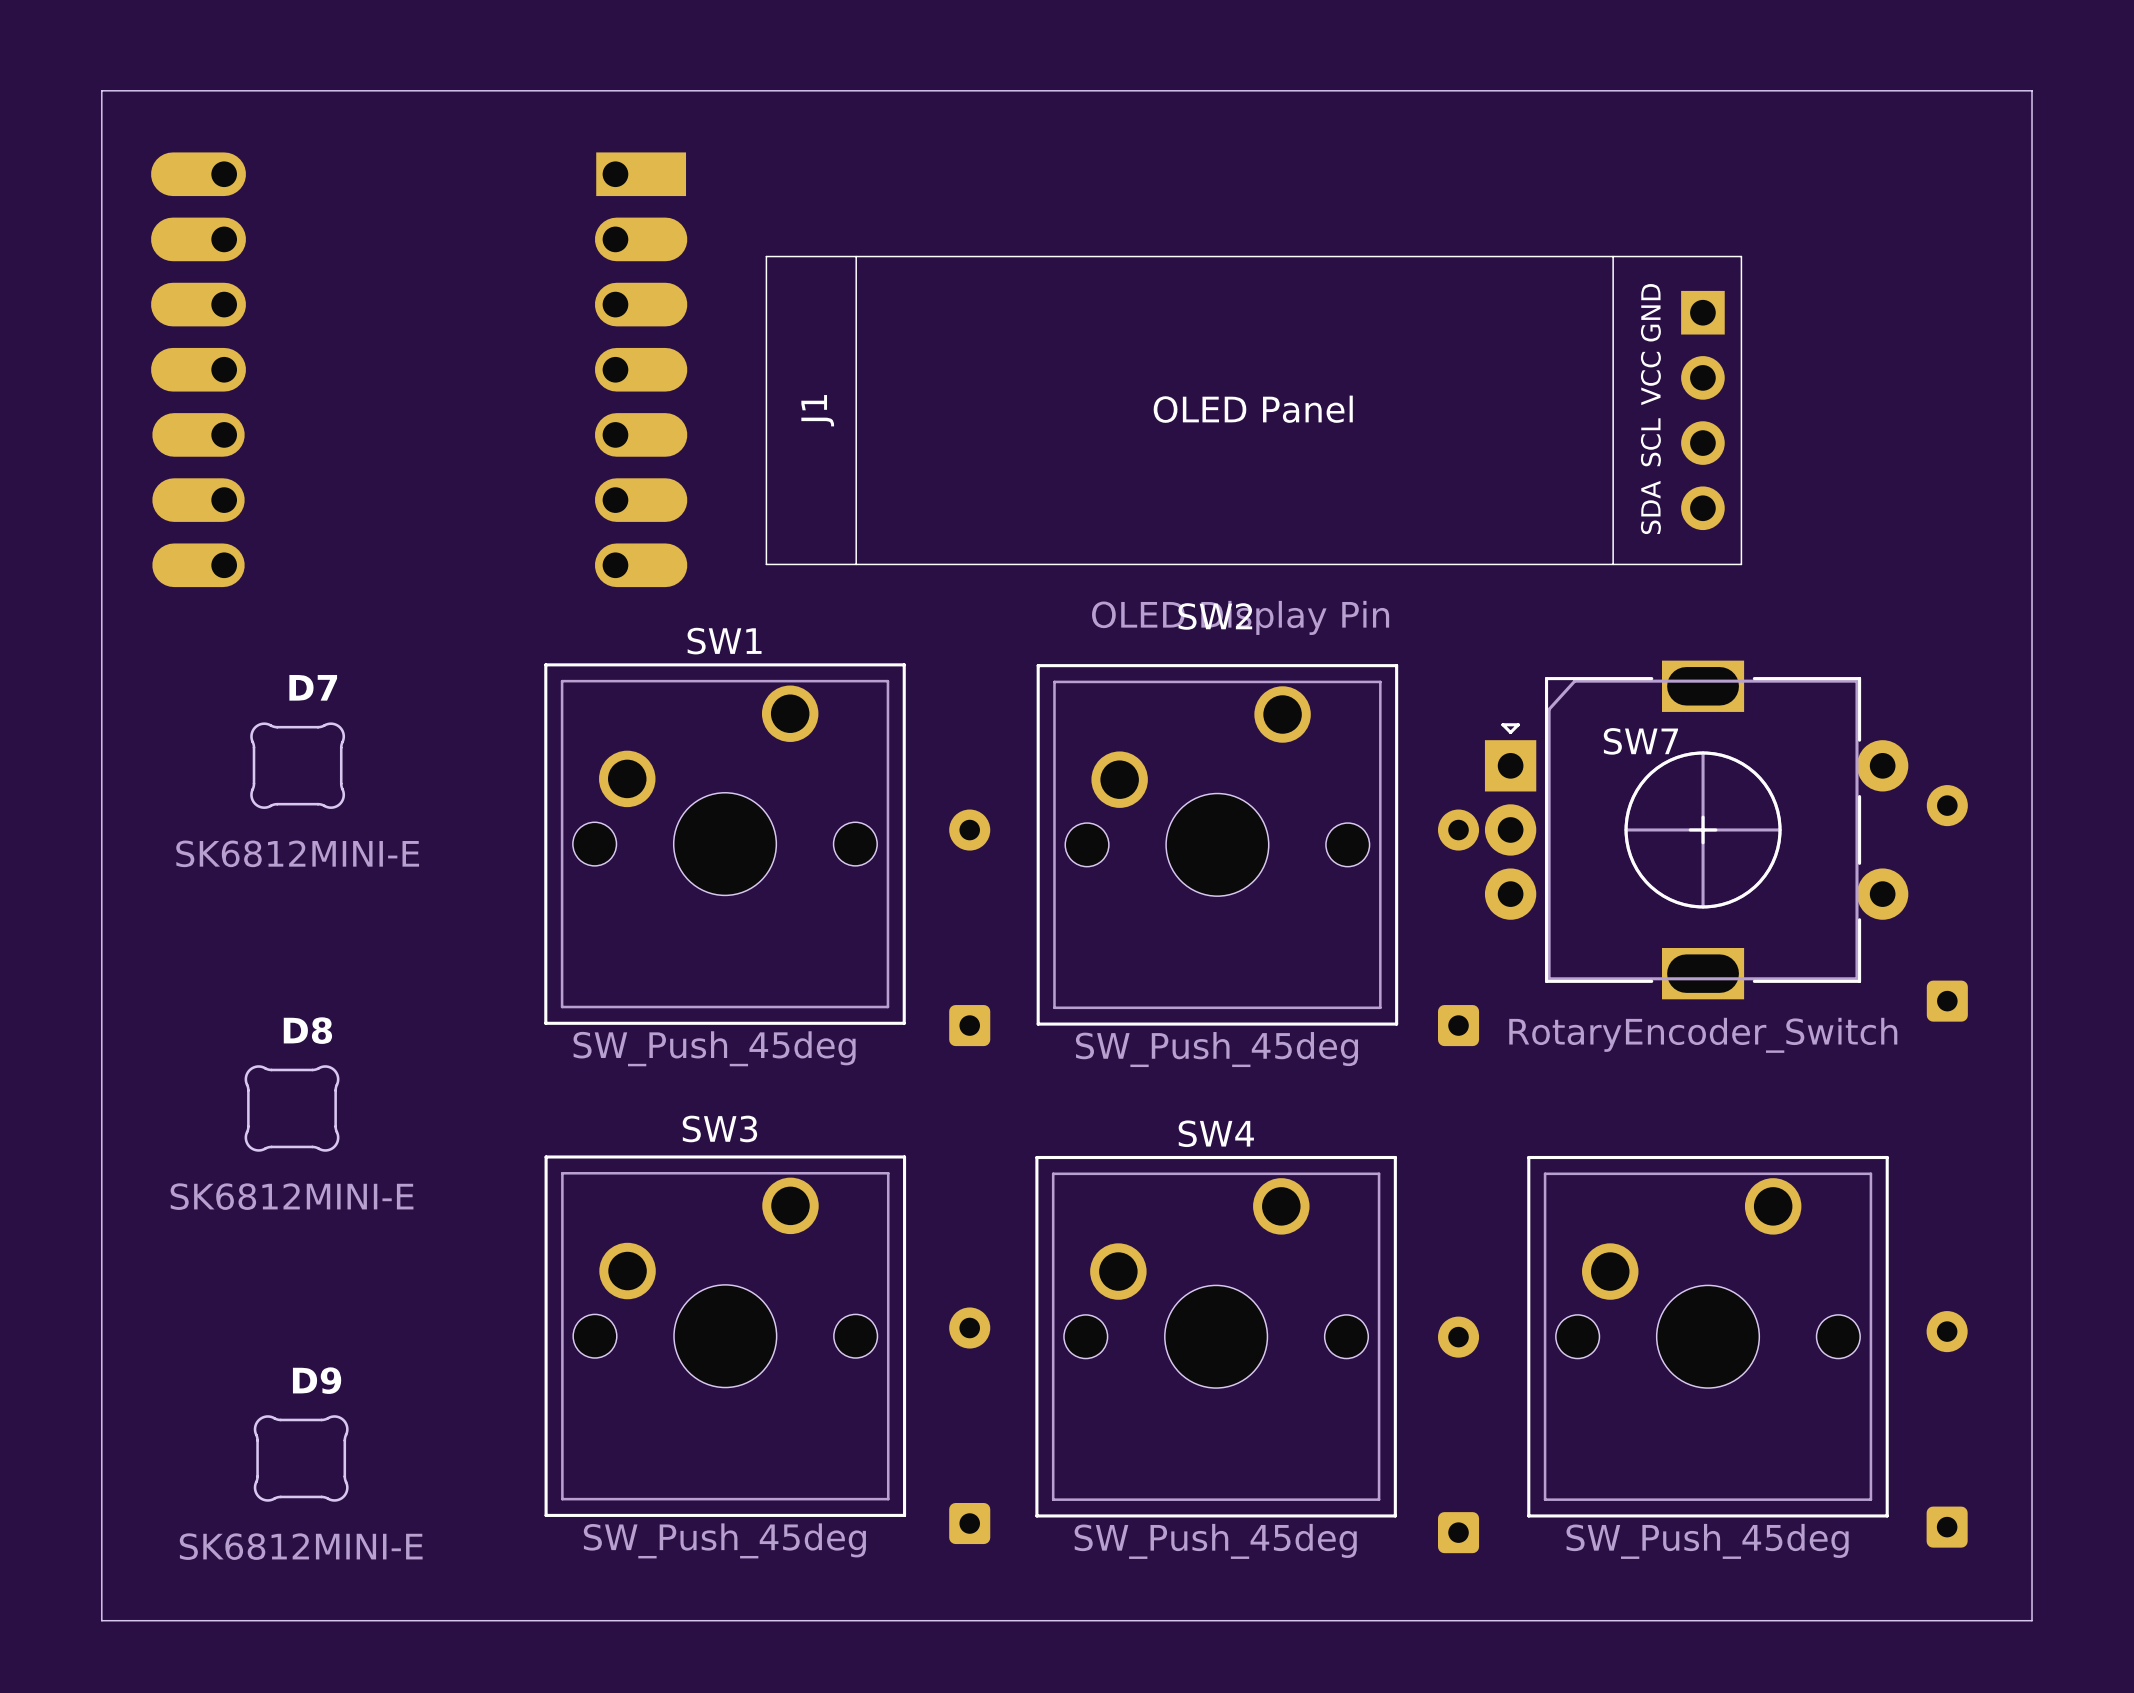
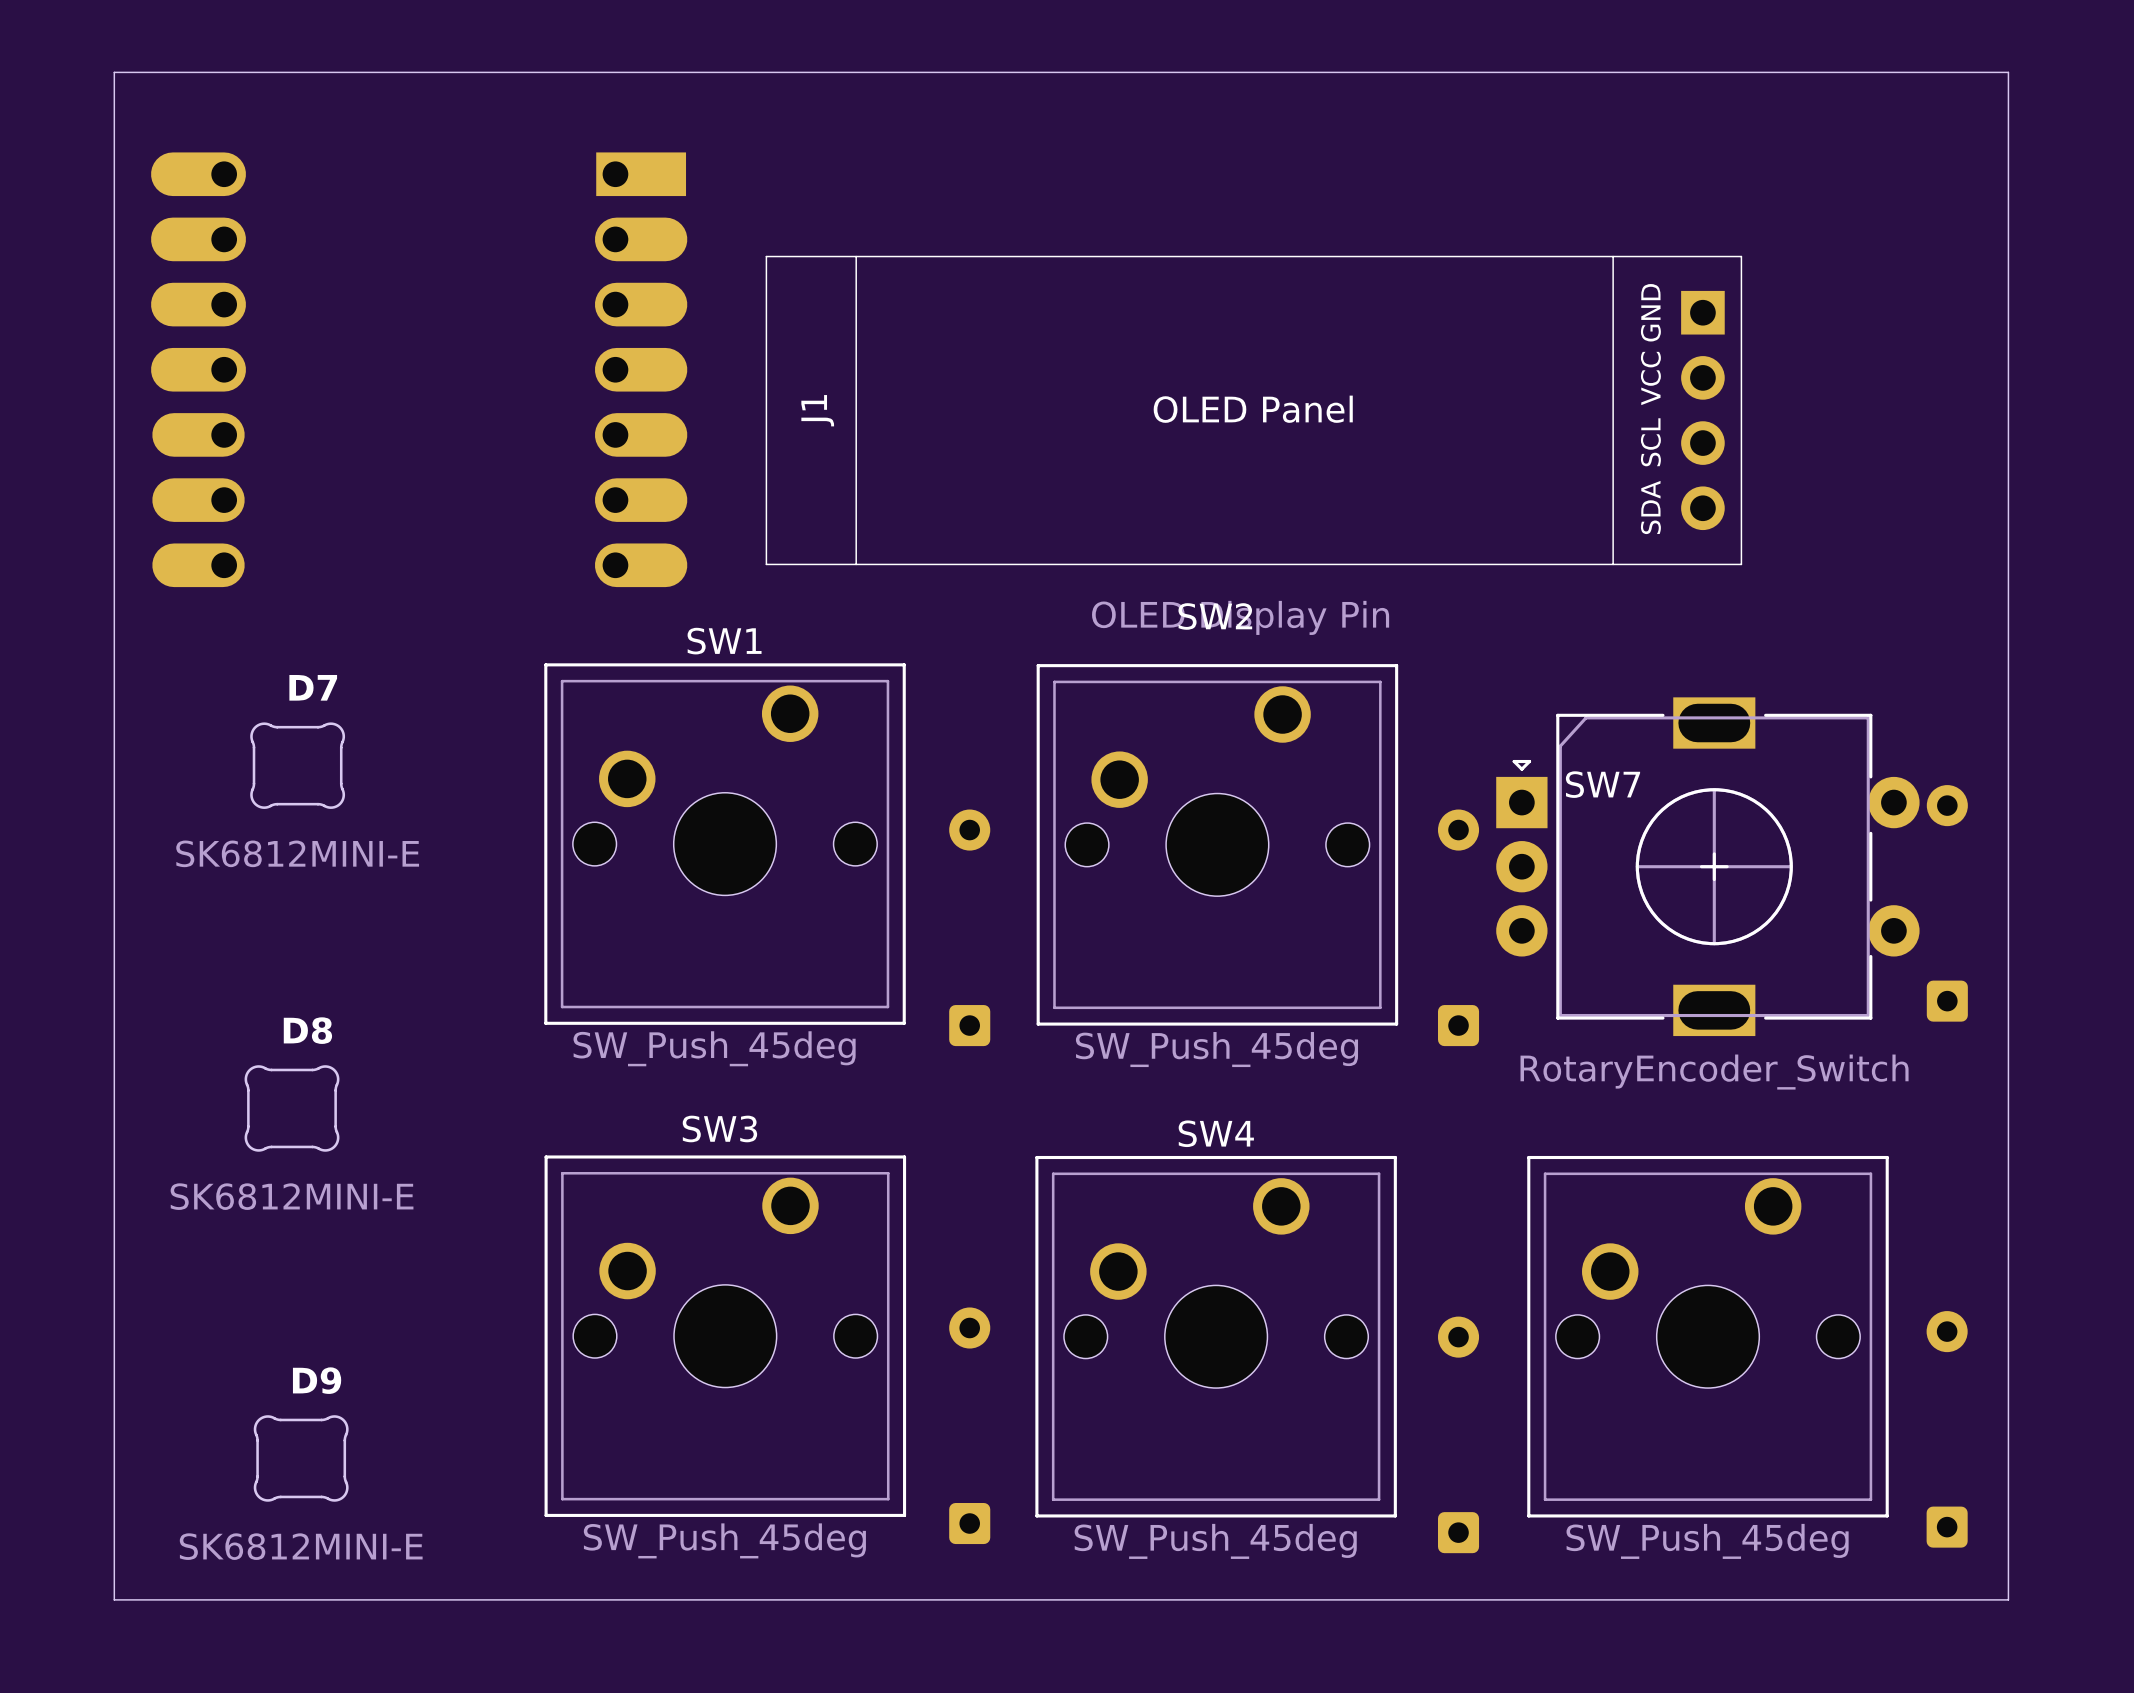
board edge: (101, 90) (2032, 90) (2032, 1620) (101, 1620) (101, 90) -> (114, 72) (114, 1599) (2008, 1599) (2008, 72) (114, 72)
SW7 name position: SW7 (1640, 741) -> SW7 (1602, 784)
SW7 position: (1696, 829) -> (1707, 866)

